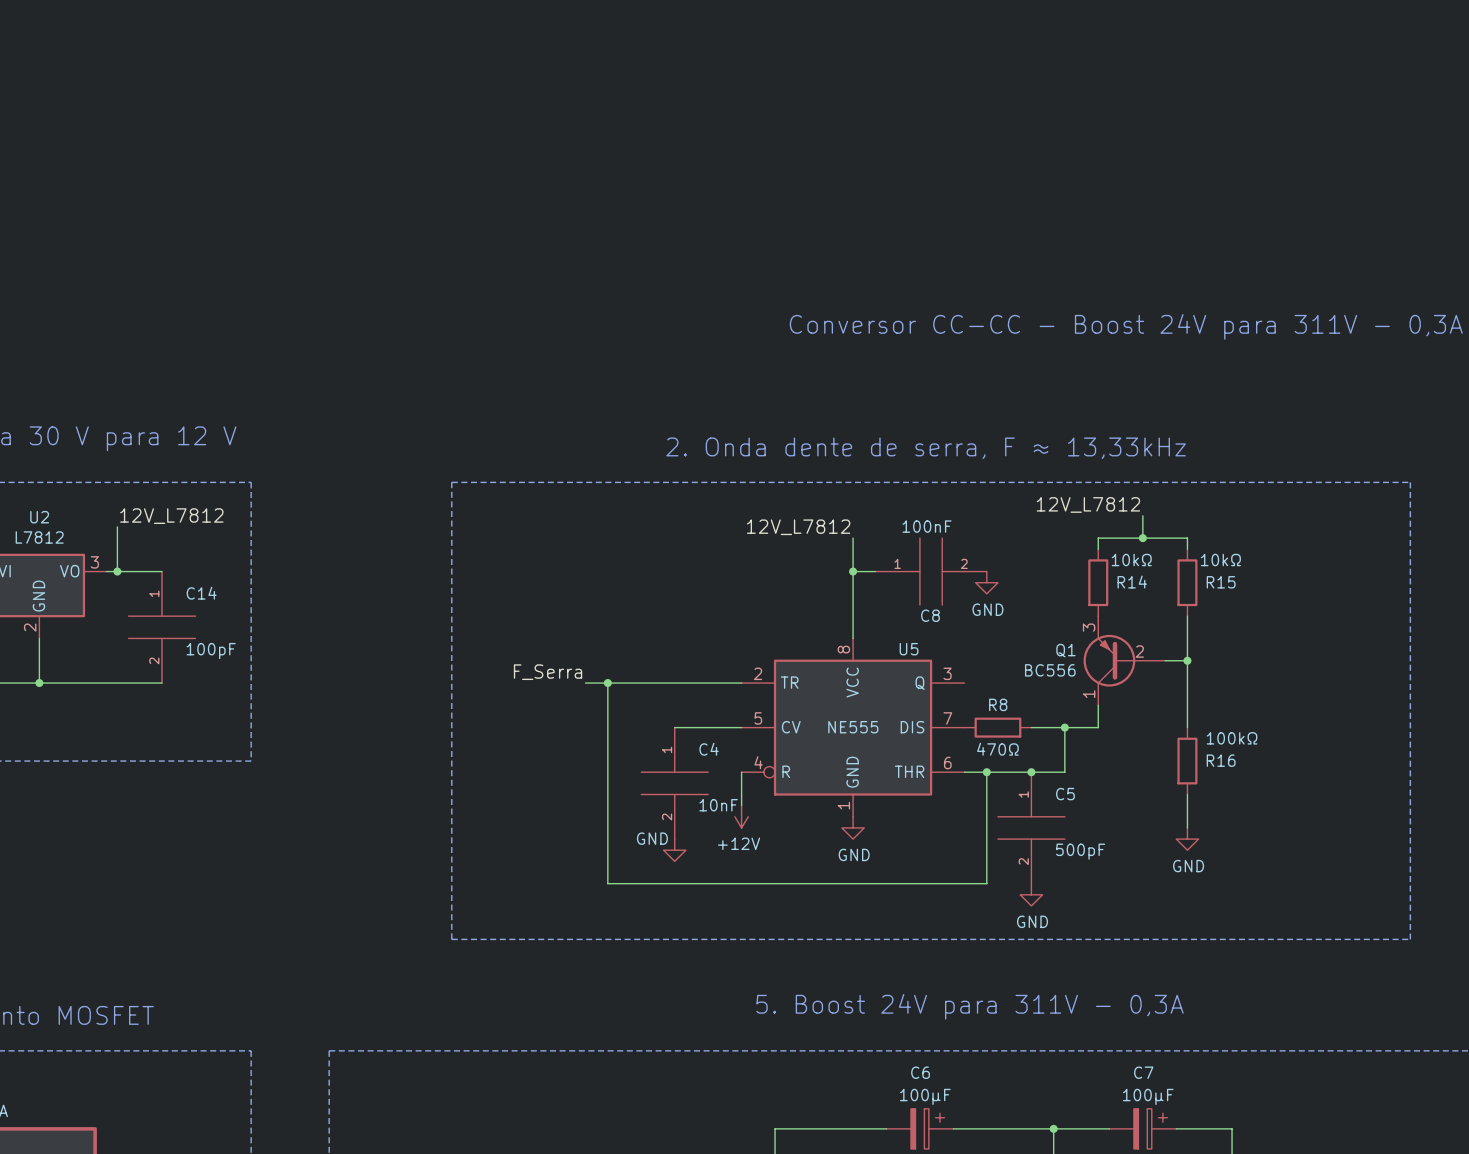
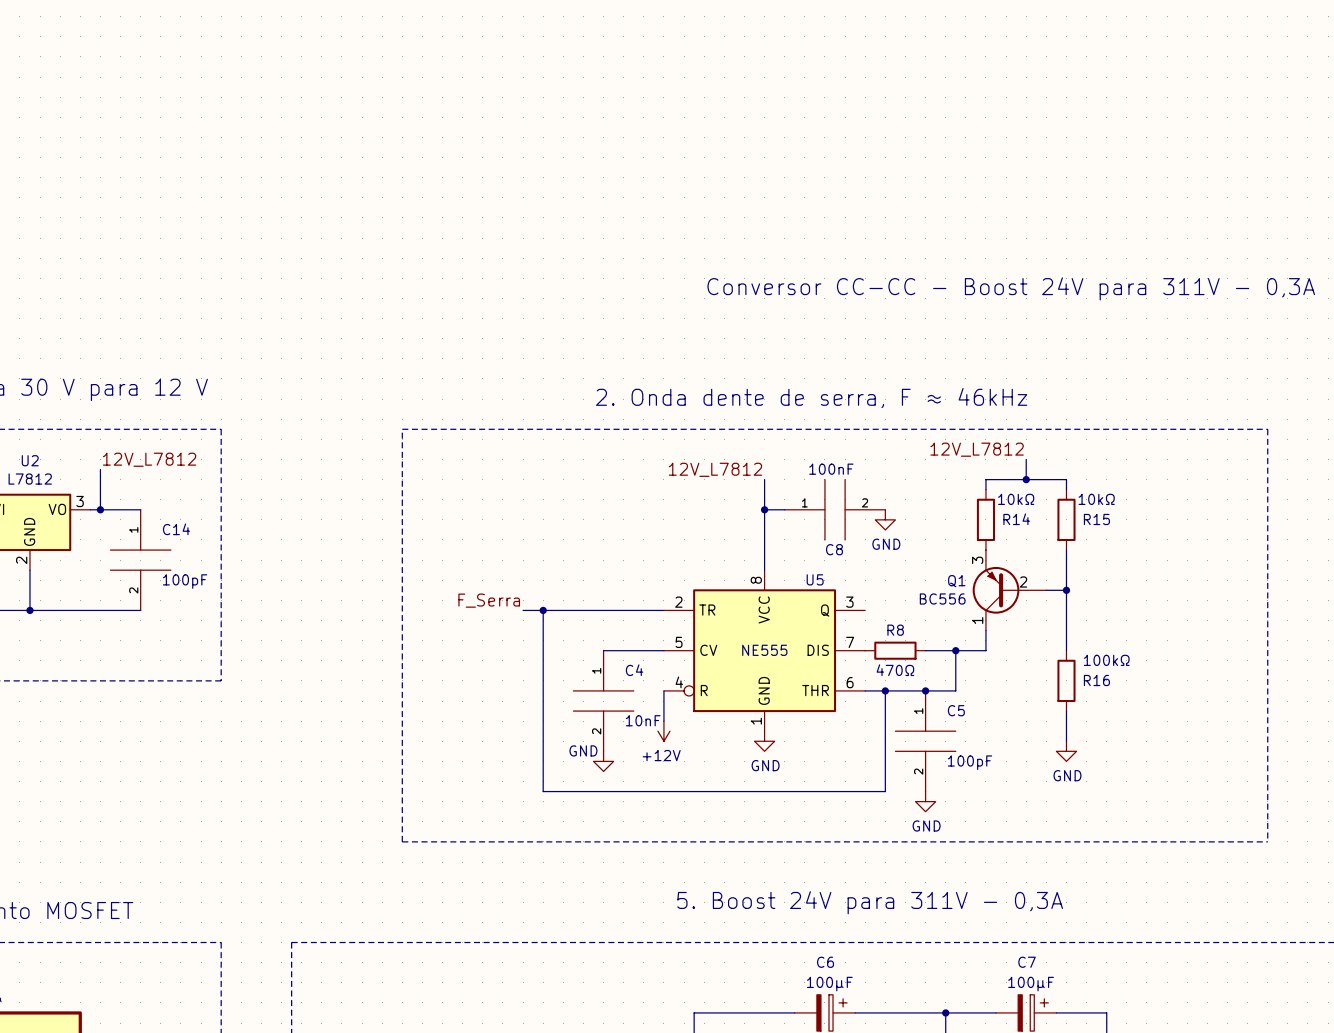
text: 2. Onda dente de serra, F ≈ 13,33kHz (926, 448) -> 2. Onda dente de serra, F ≈ 46kHz (811, 398)
C5 value: 500pF (1080, 851) -> 100pF (969, 762)

